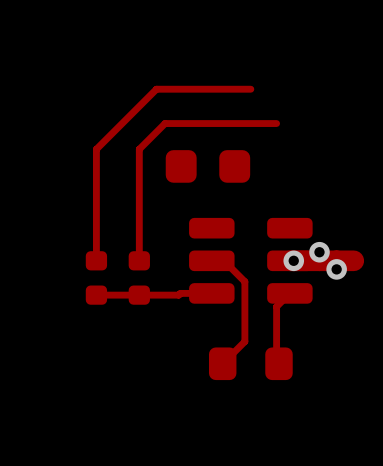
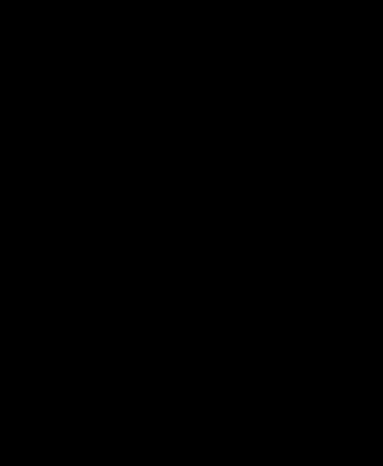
top track: (250, 89) (156, 89) (96, 149) (96, 260) -> none
top track: (276, 123) (165, 123) (139, 149) (139, 260) -> none
part: (207, 166) -> none
via: (319, 252) -> none
top track: (211, 260) (223, 260) (244, 281) (244, 341) (222, 363) -> none
part: (250, 260) -> none
via: (293, 260) -> none
top track: (353, 260) (289, 260) -> none
via: (336, 269) -> none
part: (96, 277) -> none
part: (139, 277) -> none
top track: (211, 293) (96, 295) -> none
top track: (289, 293) (276, 306) (276, 363) (278, 363) -> none
part: (250, 363) -> none

